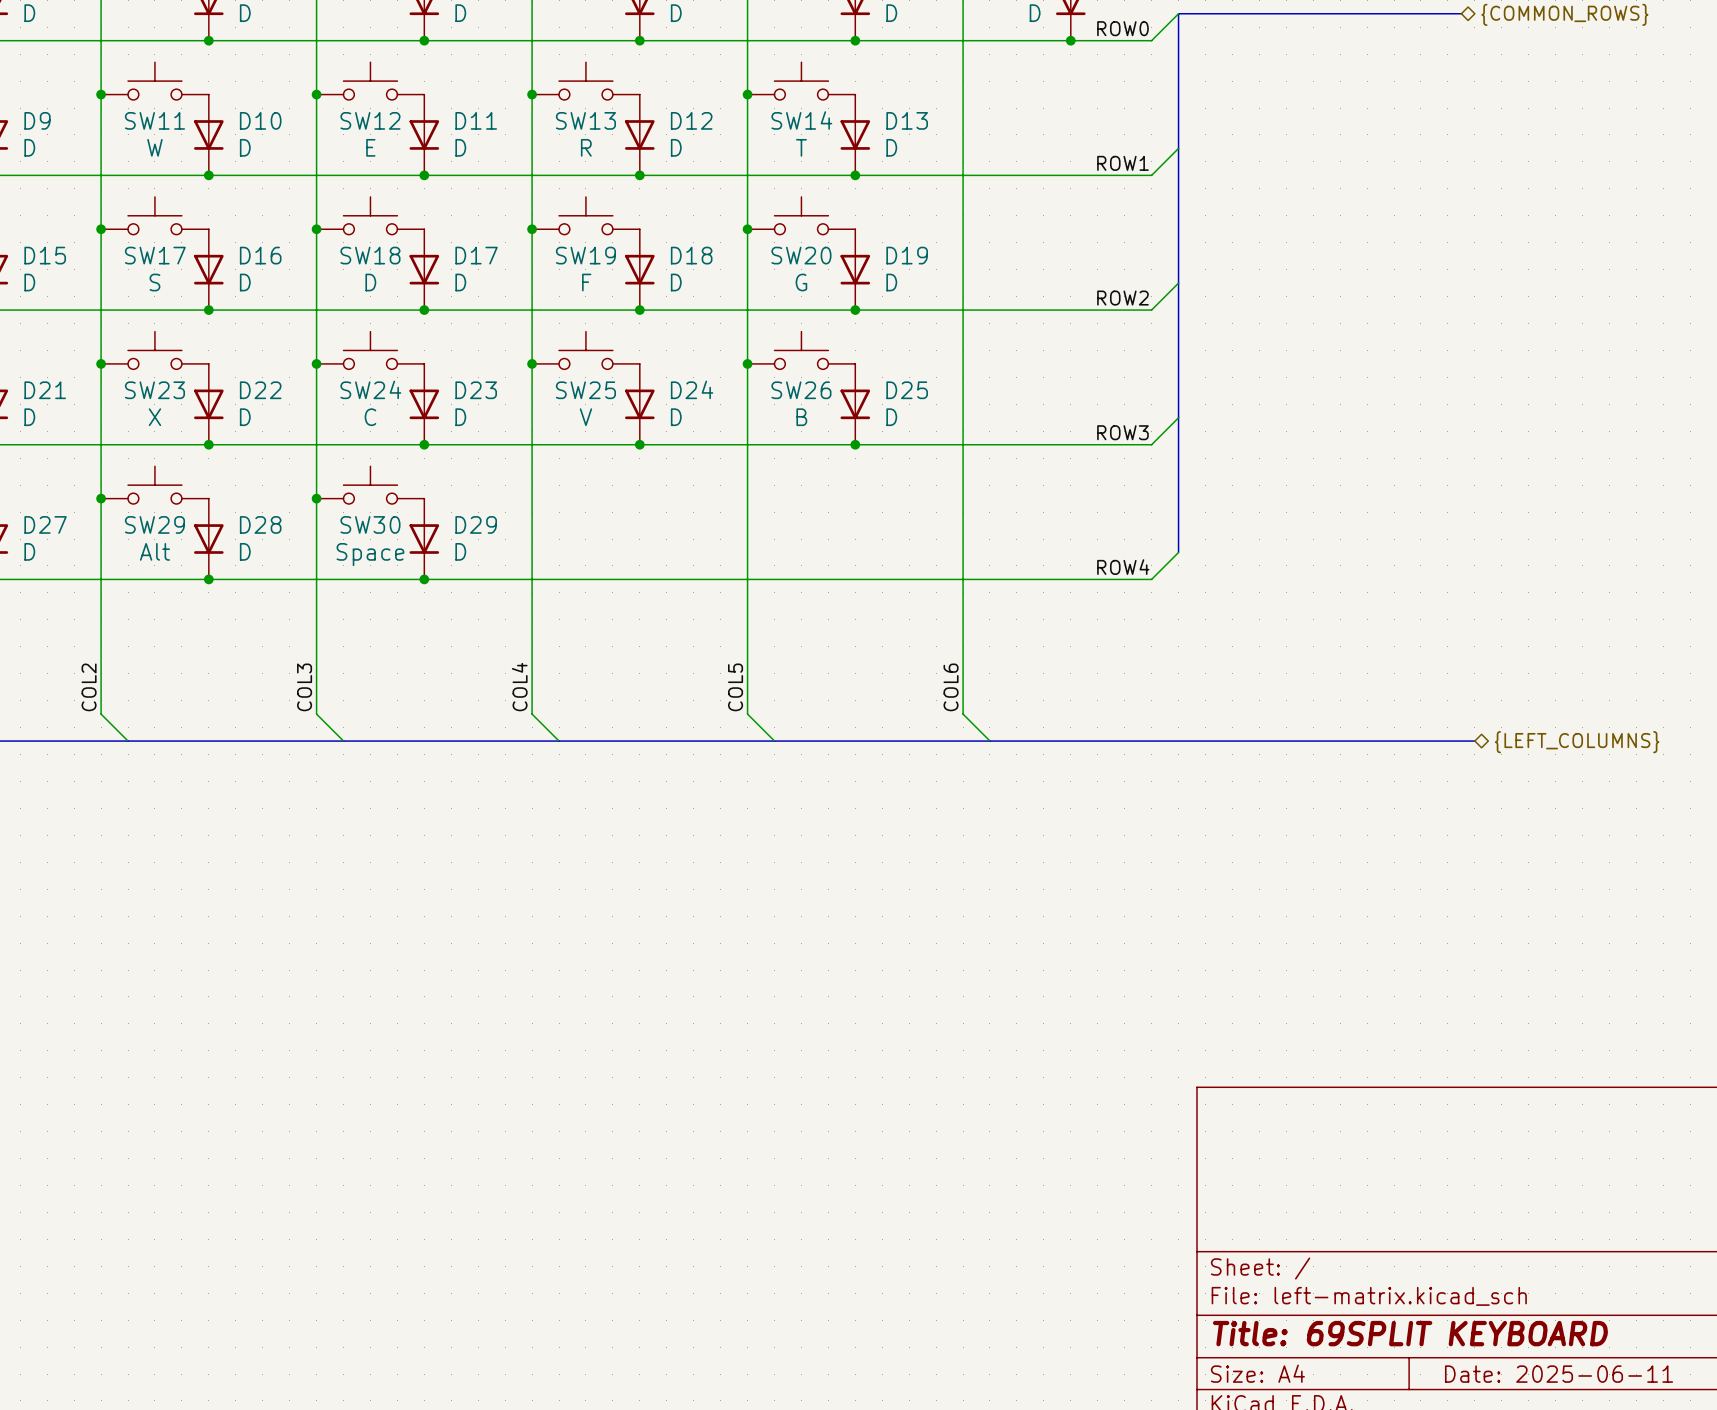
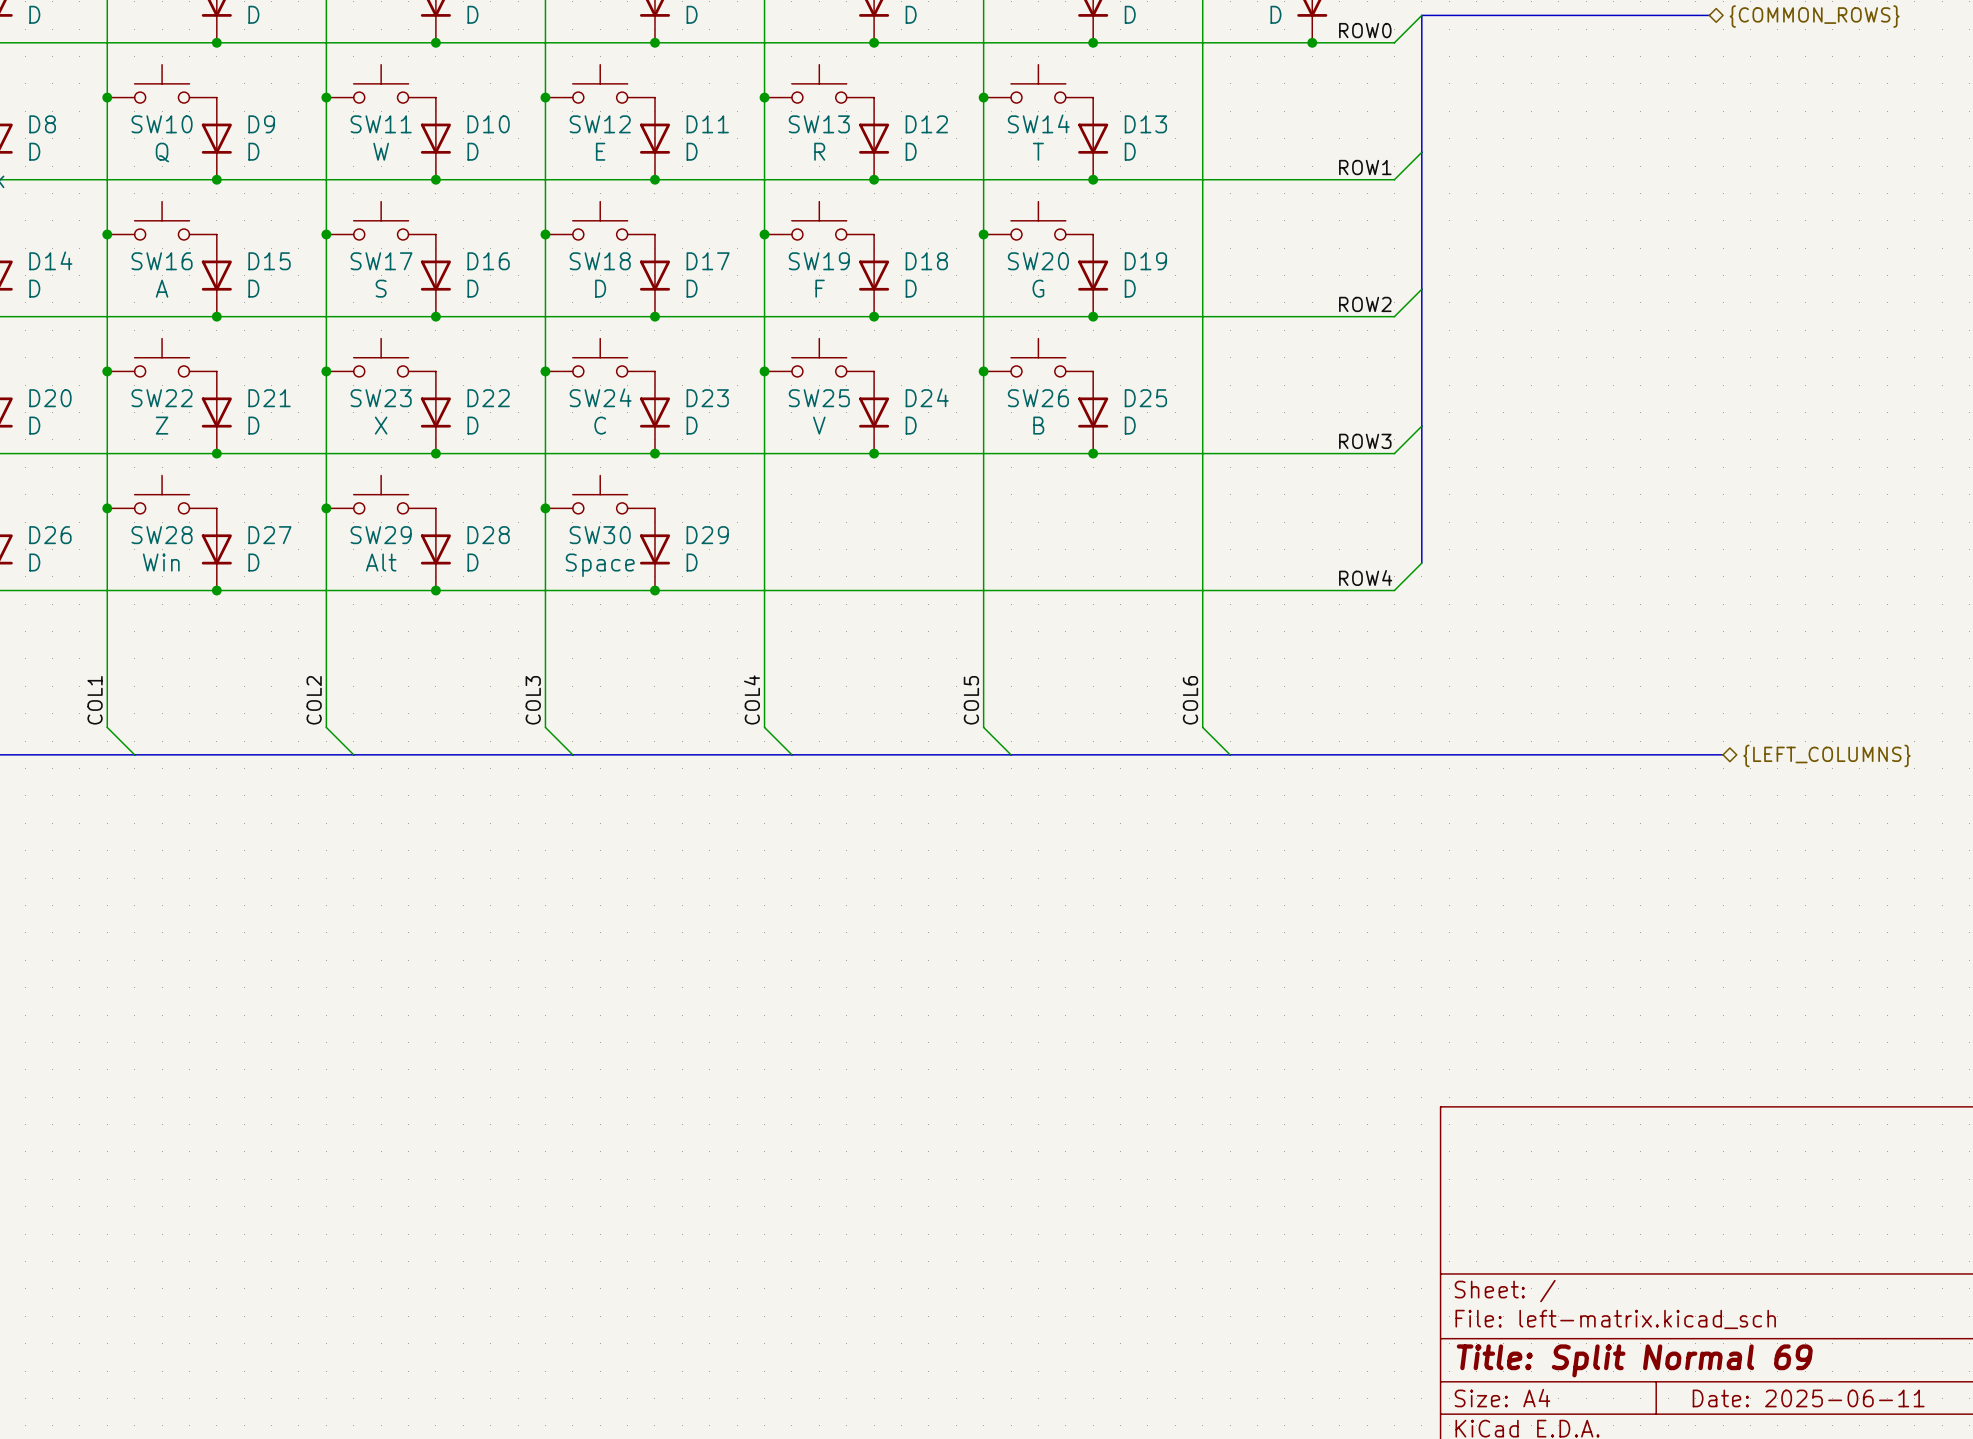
title block: Title: 69SPLIT KEYBOARD (1410, 1333) -> Title: Split Normal 69 (1634, 1360)

